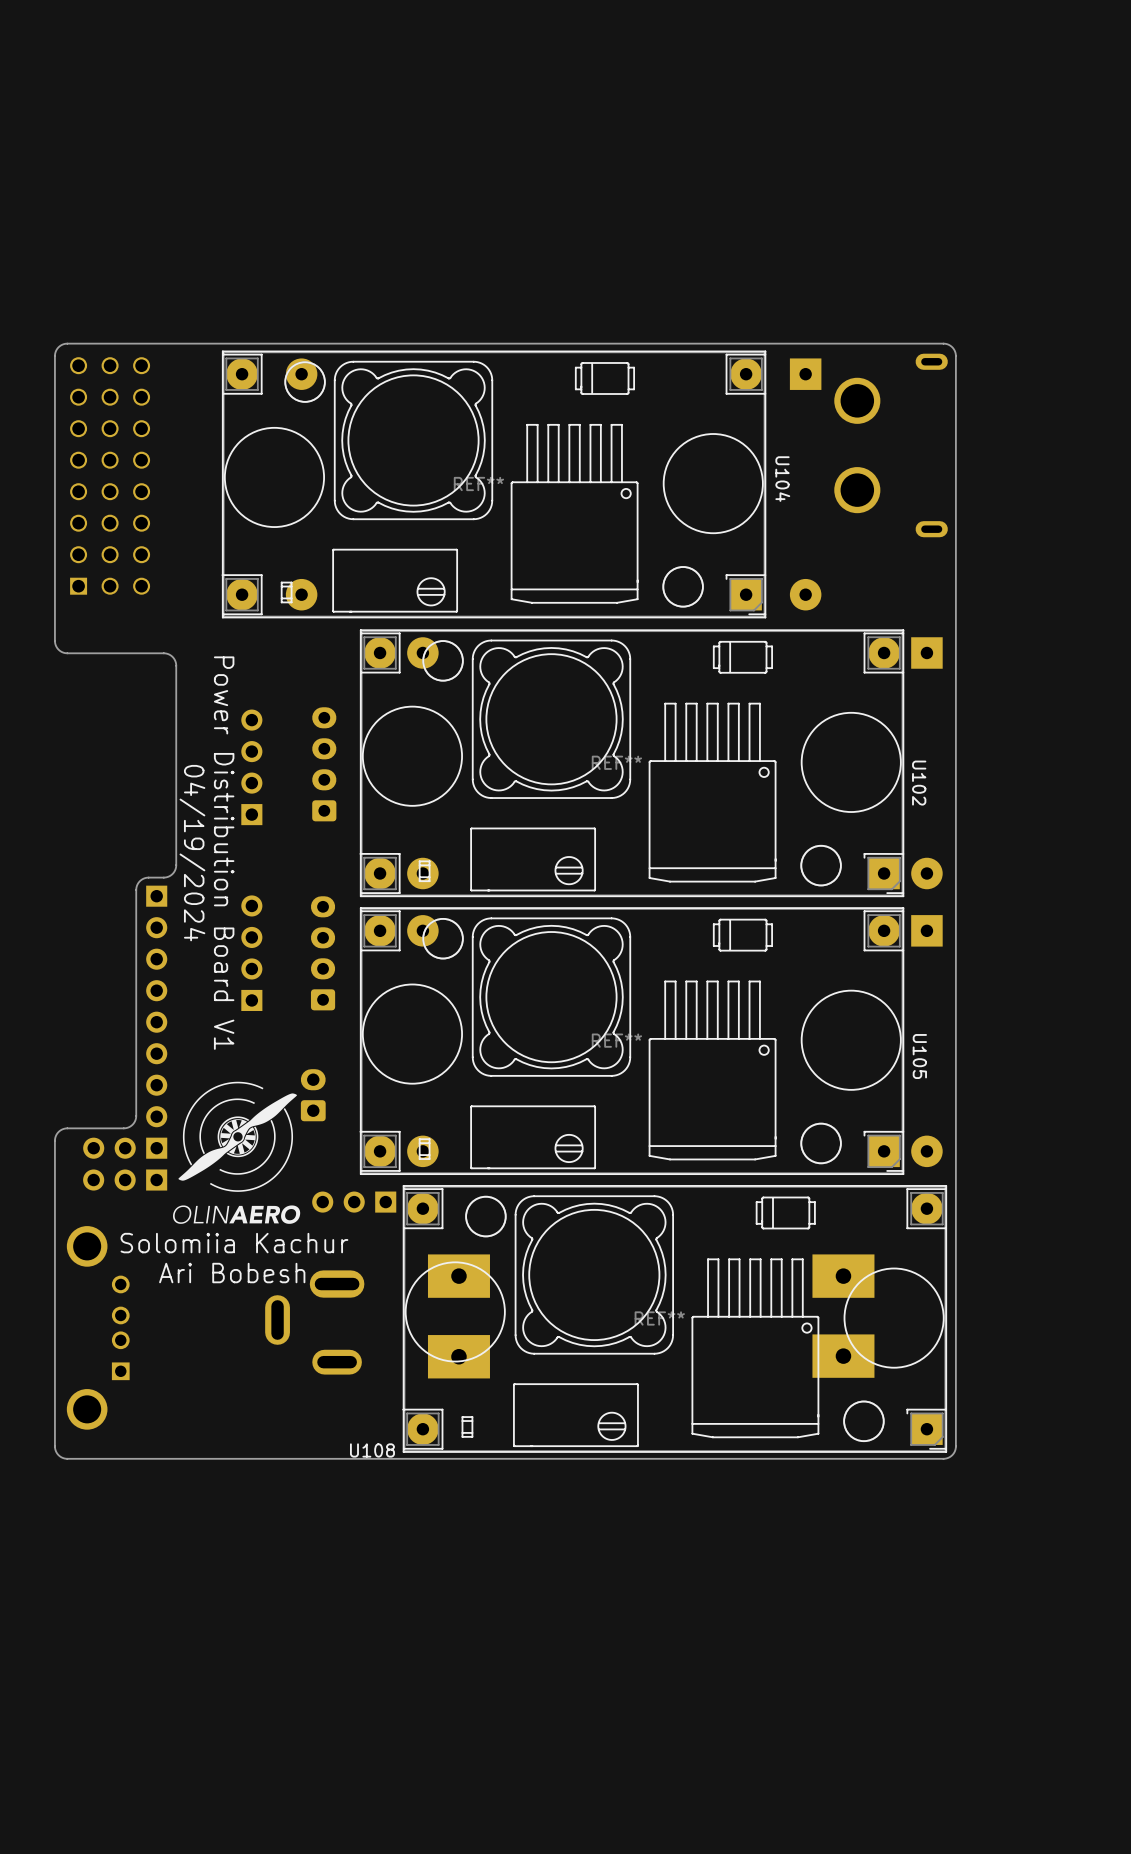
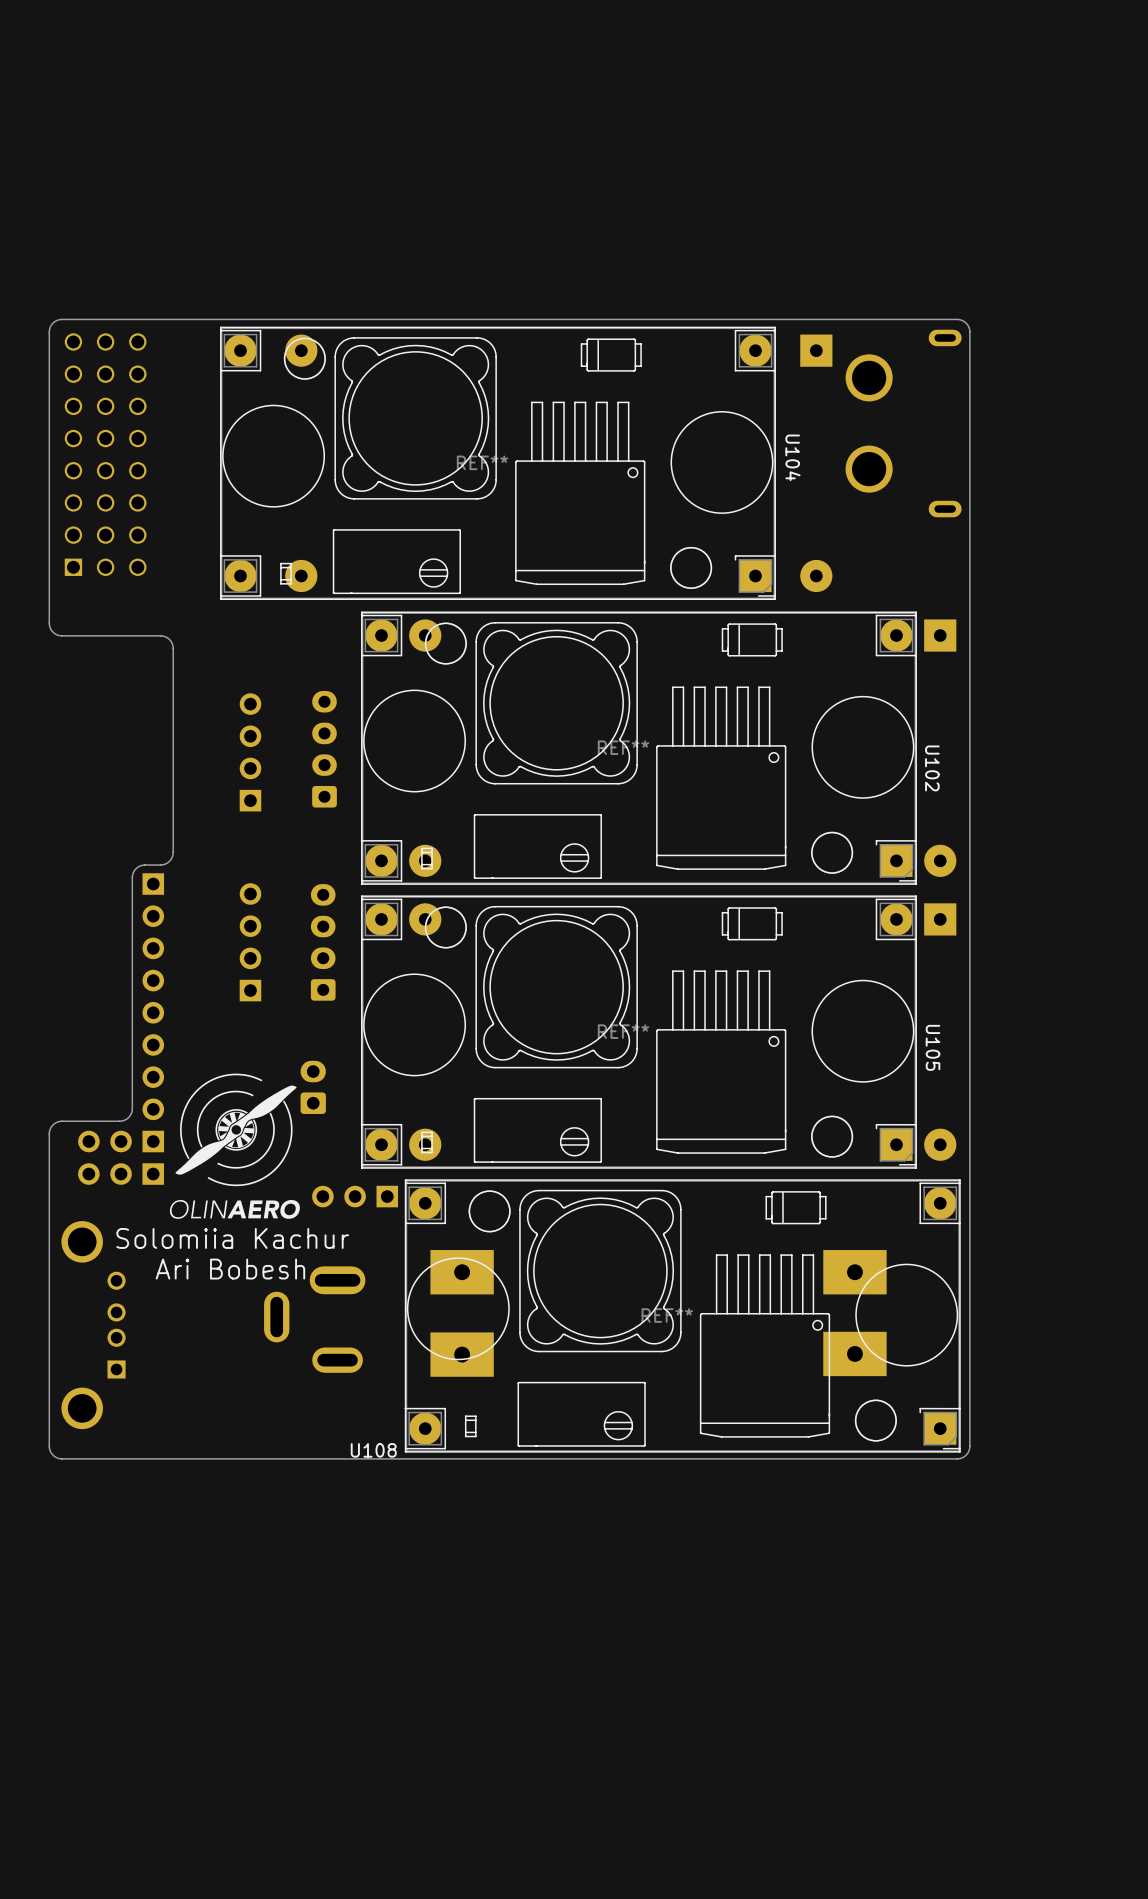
text: 04/19/2024 (192, 853) -> none
text: Power Distribution Board V1 (224, 853) -> none

